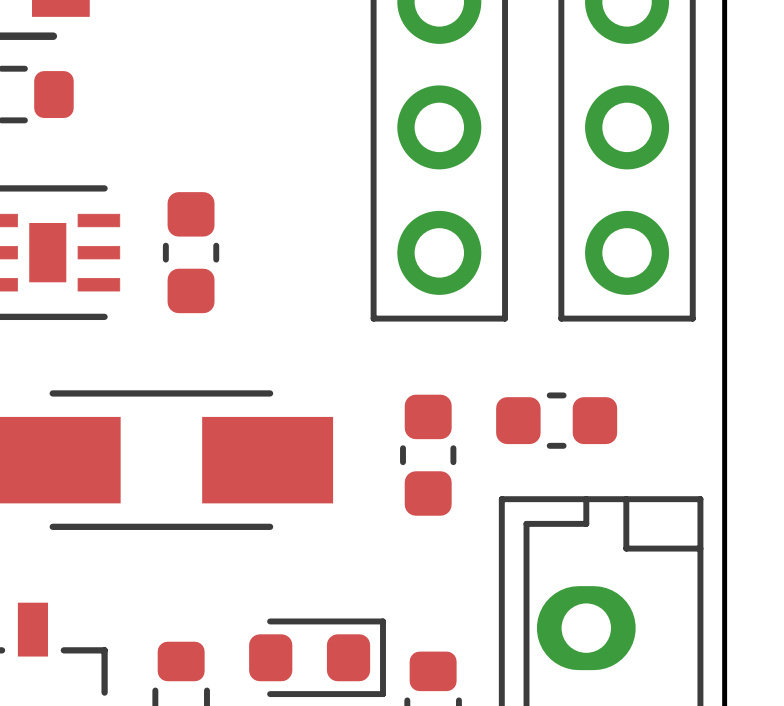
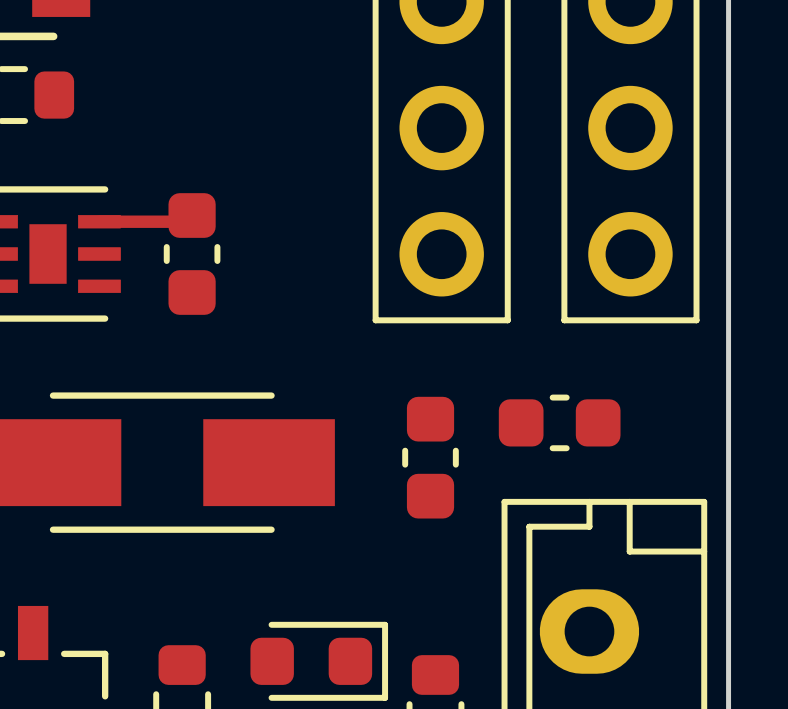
top track: none -> (192, 215) (185, 221) (99, 221)

